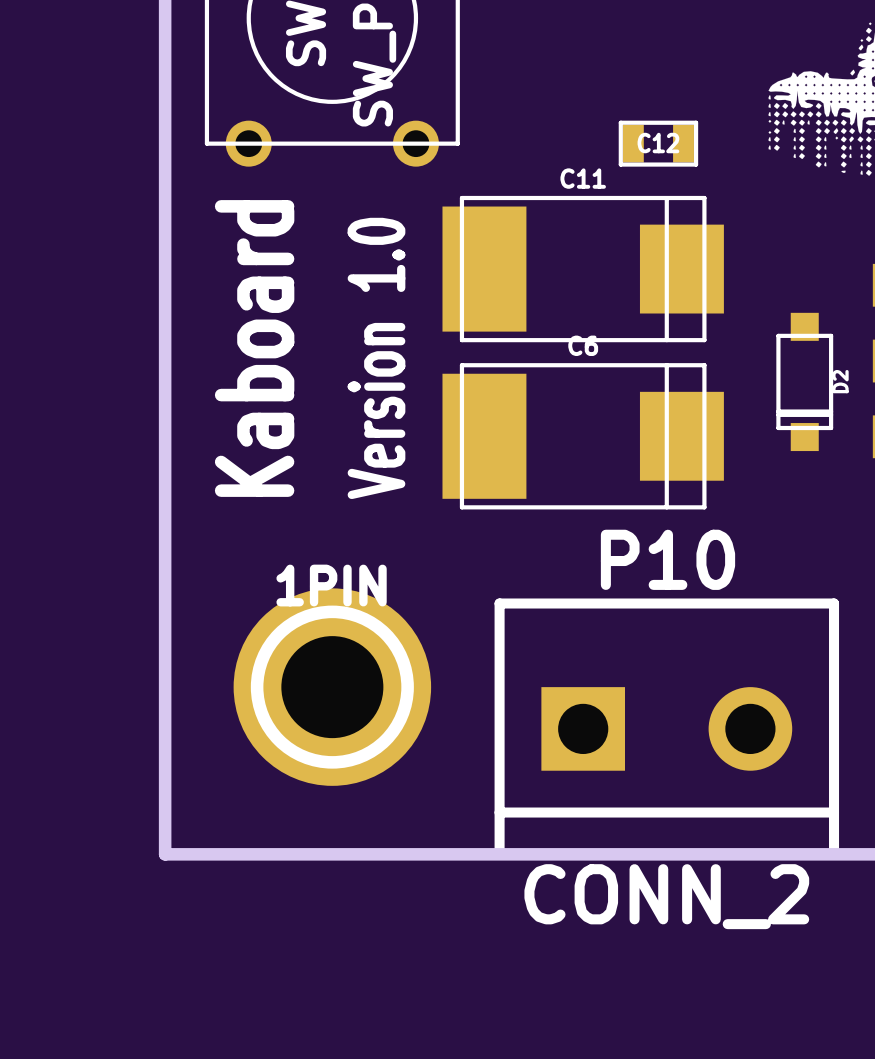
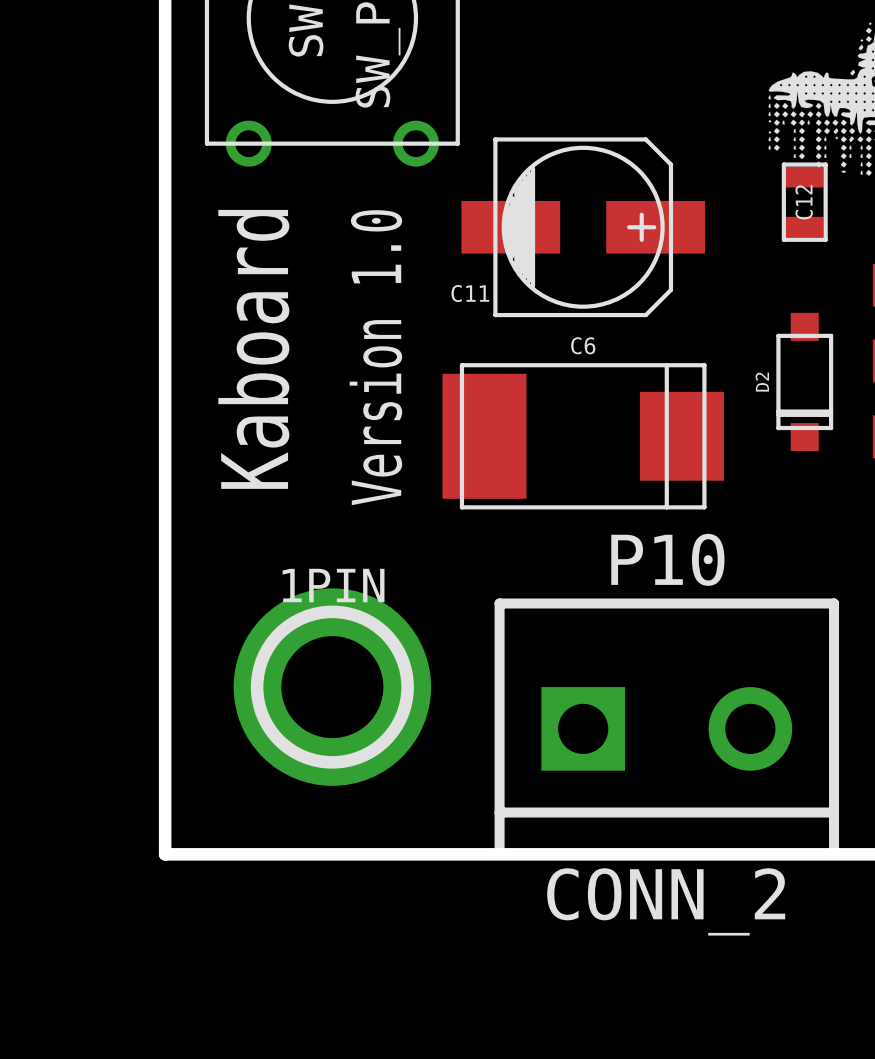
C12 rotation: 0° (658, 143) -> 90° clockwise (804, 202)
C12 position: (658, 143) -> (804, 202)
C11 name position: C11 (583, 178) -> C11 (470, 293)
C11 footprint: [442, 195, 724, 343] -> [461, 137, 705, 318]
D2 name position: D2 (840, 381) -> D2 (762, 382)

